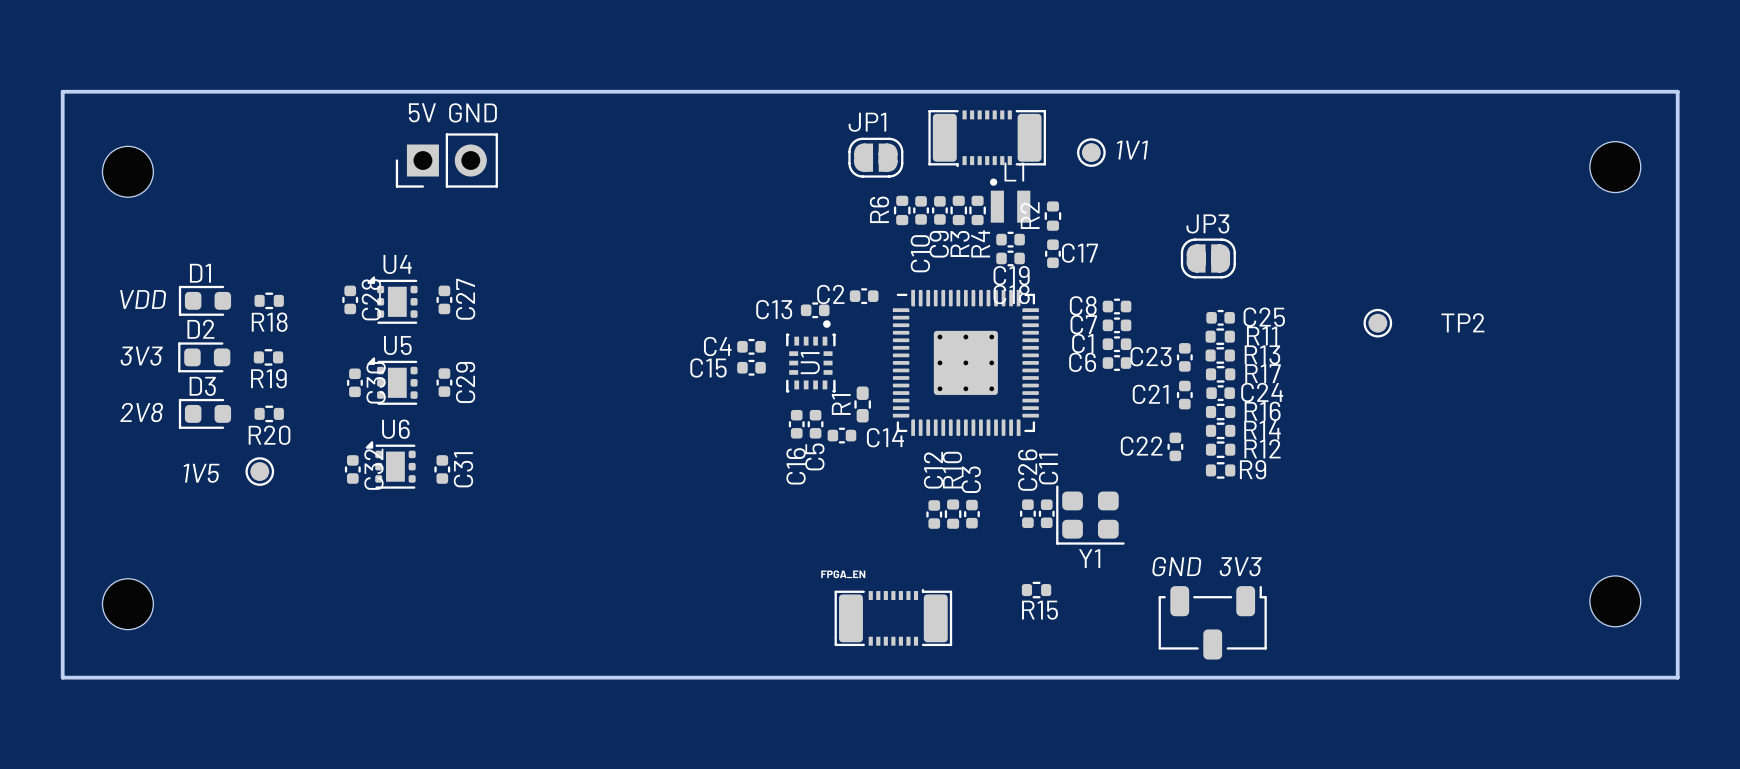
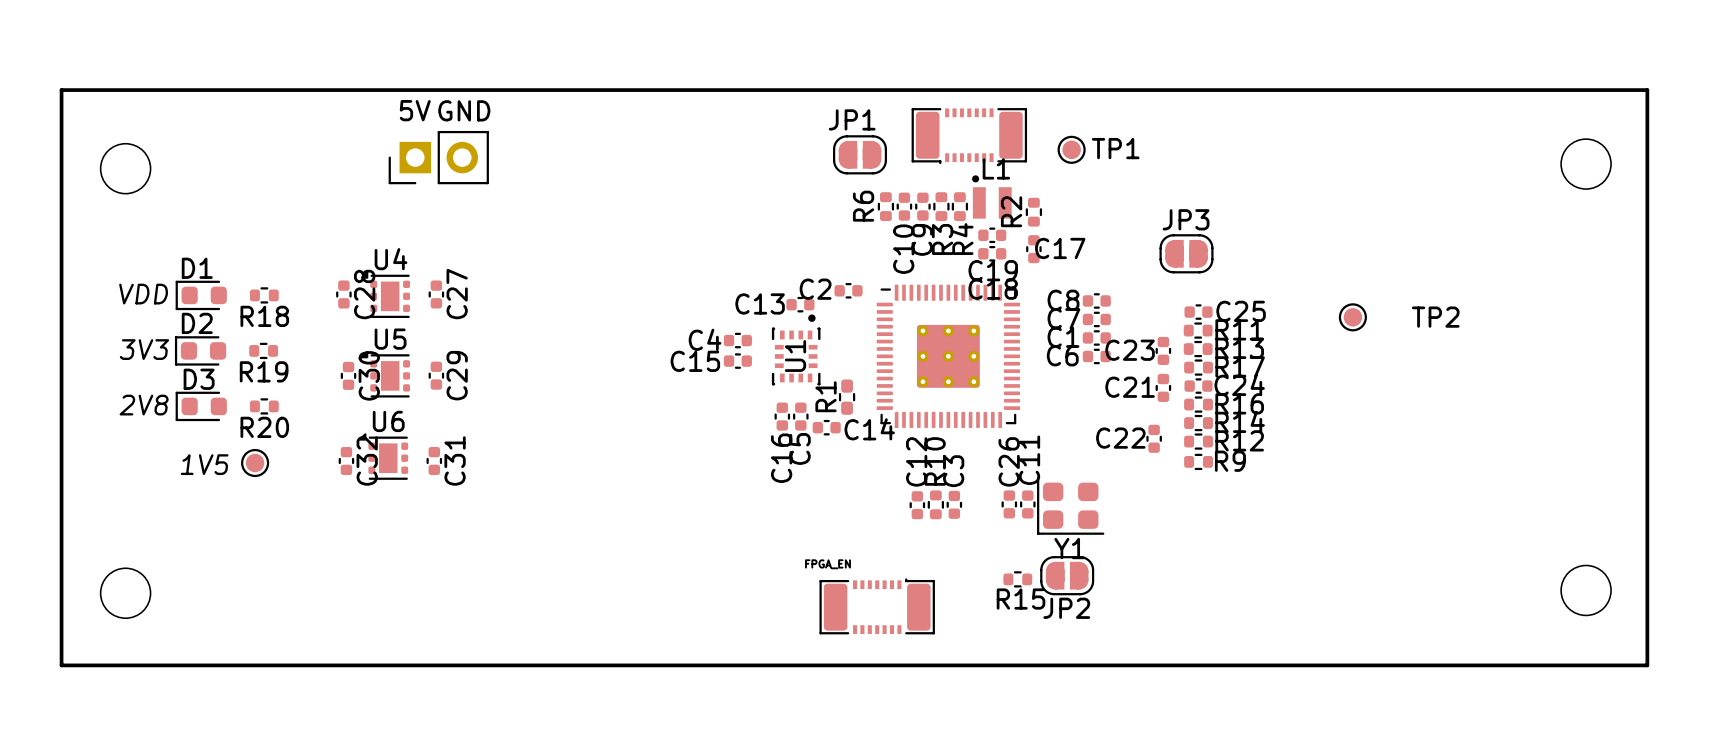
text: 1V1 (1132, 150) -> none
TP1 name: none -> TP1 (1115, 148)
text: GND (1176, 566) -> none
text: 3V3 (1240, 566) -> none
JP2: none -> (1067, 575)
part: (1212, 622) -> none

